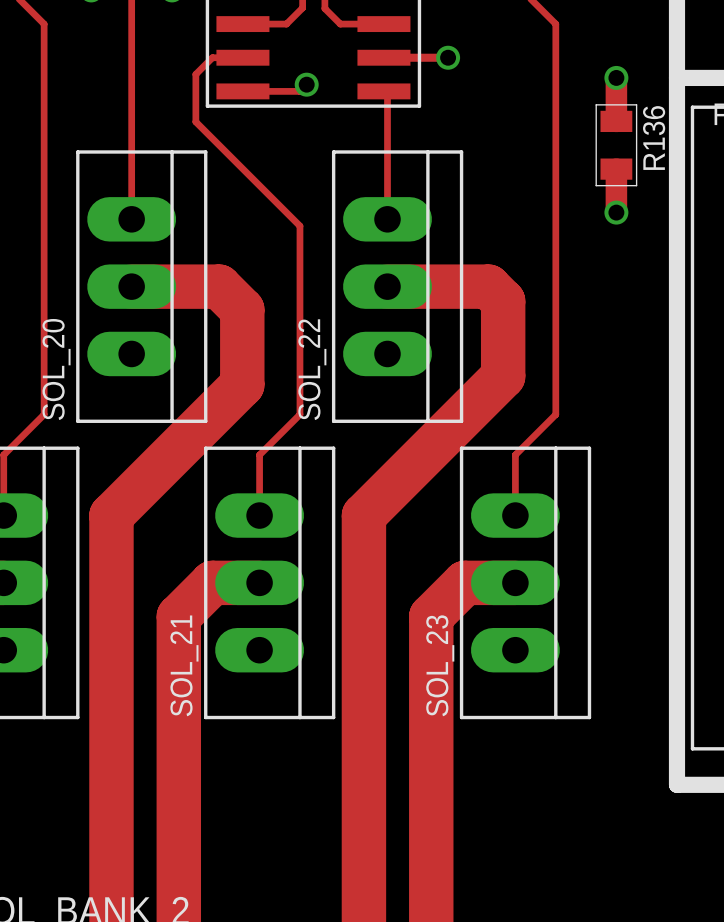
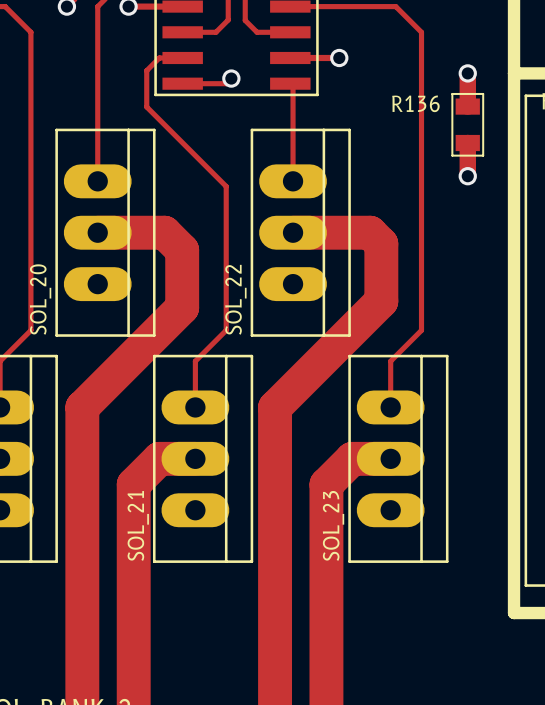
R136 name rotation: 0° (654, 138) -> 90° clockwise (415, 103)
R136 name position: R136 (654, 138) -> R136 (415, 103)

